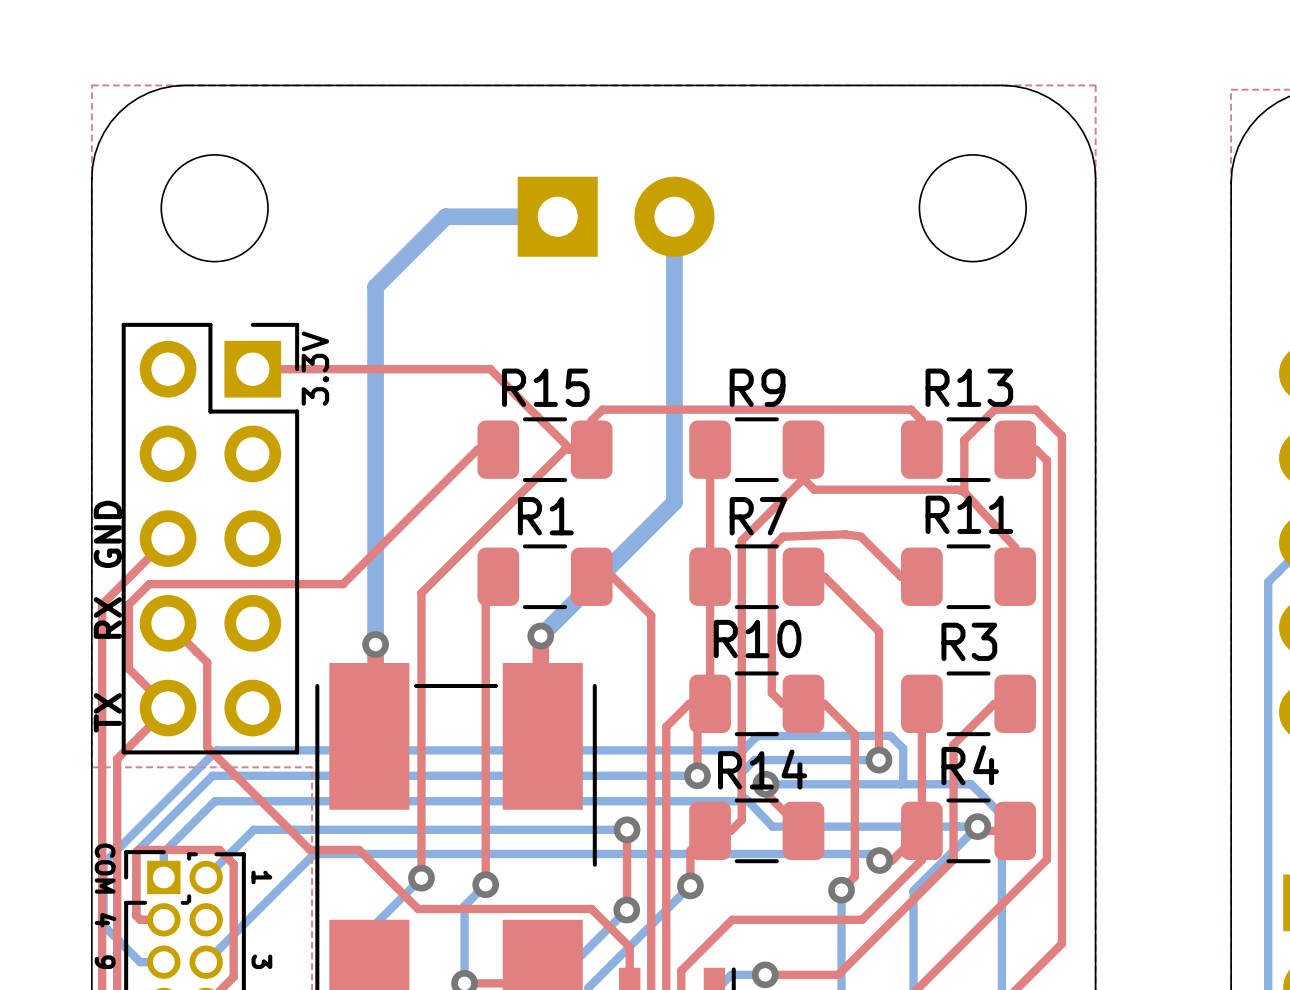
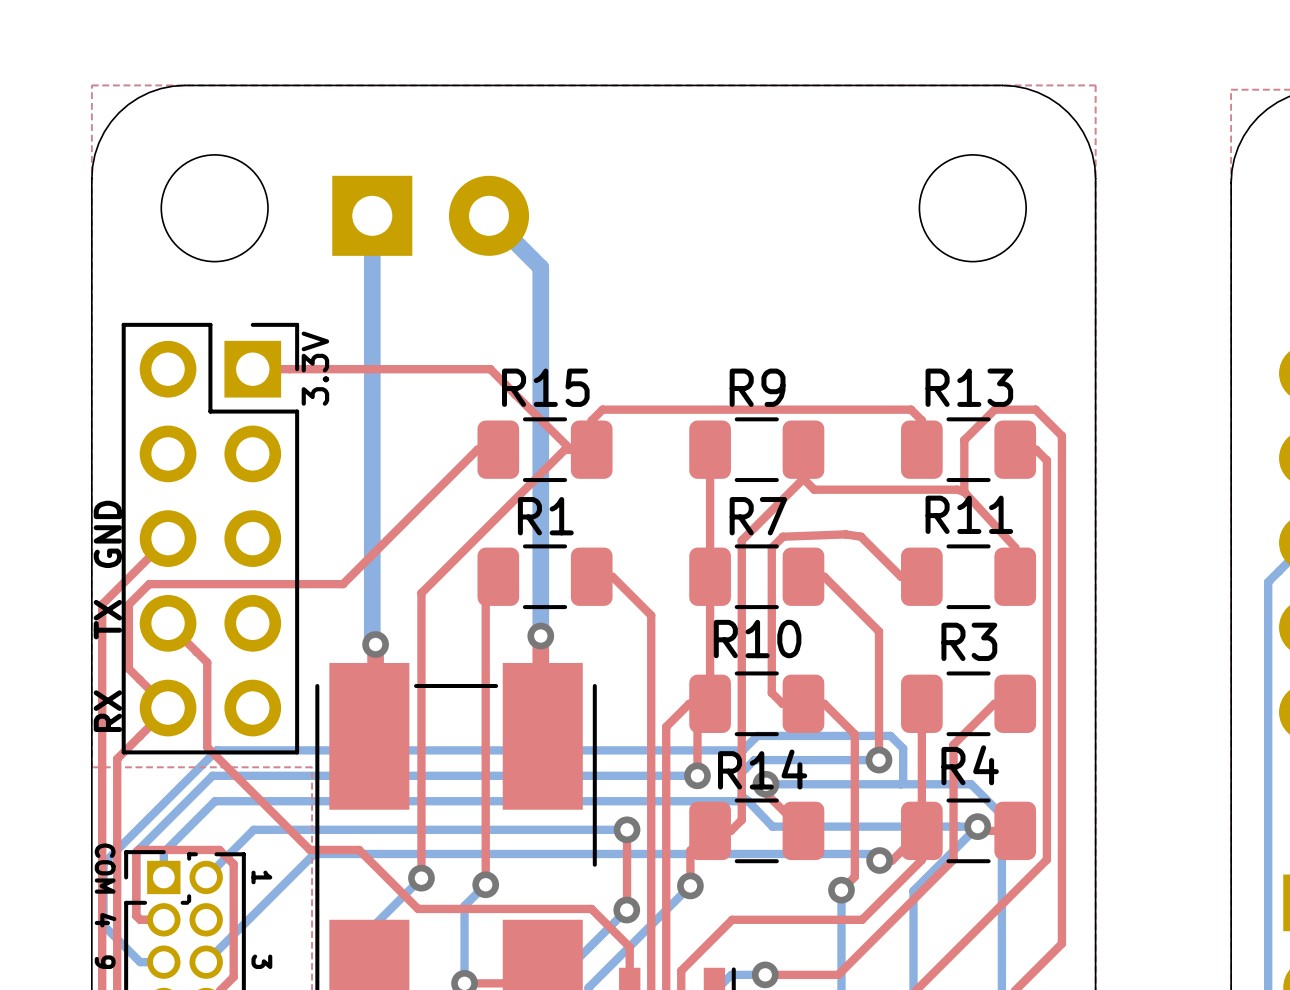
bottom track: (557, 216) (445, 216) (375, 287) (375, 644) -> (372, 215) (372, 641) (375, 644)
part position: (616, 216) -> (430, 215)
bottom track: (674, 216) (674, 502) (540, 636) -> (489, 215) (540, 267) (540, 636)
text: RX (107, 617) -> TX (107, 619)
text: TX (107, 712) -> RX (107, 711)

